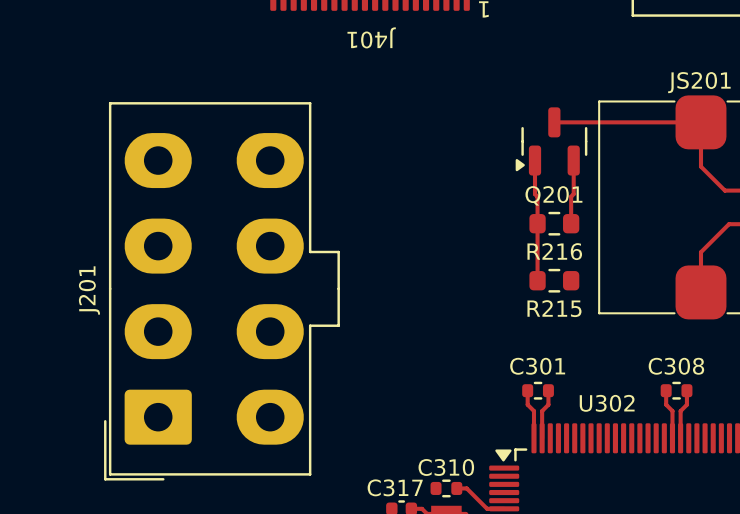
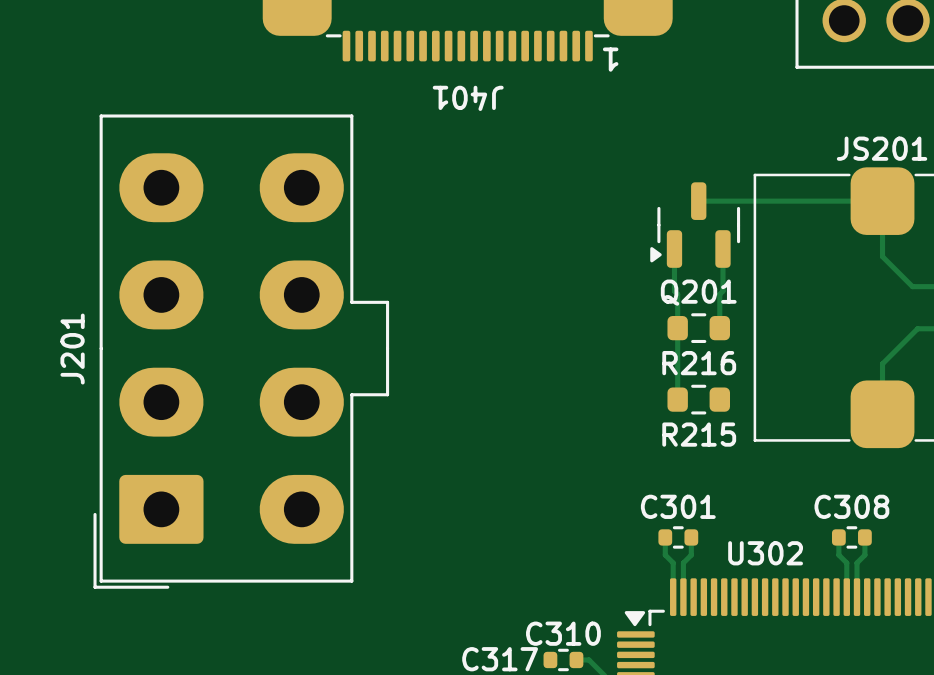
J201 position: (221, 291) -> (241, 351)

